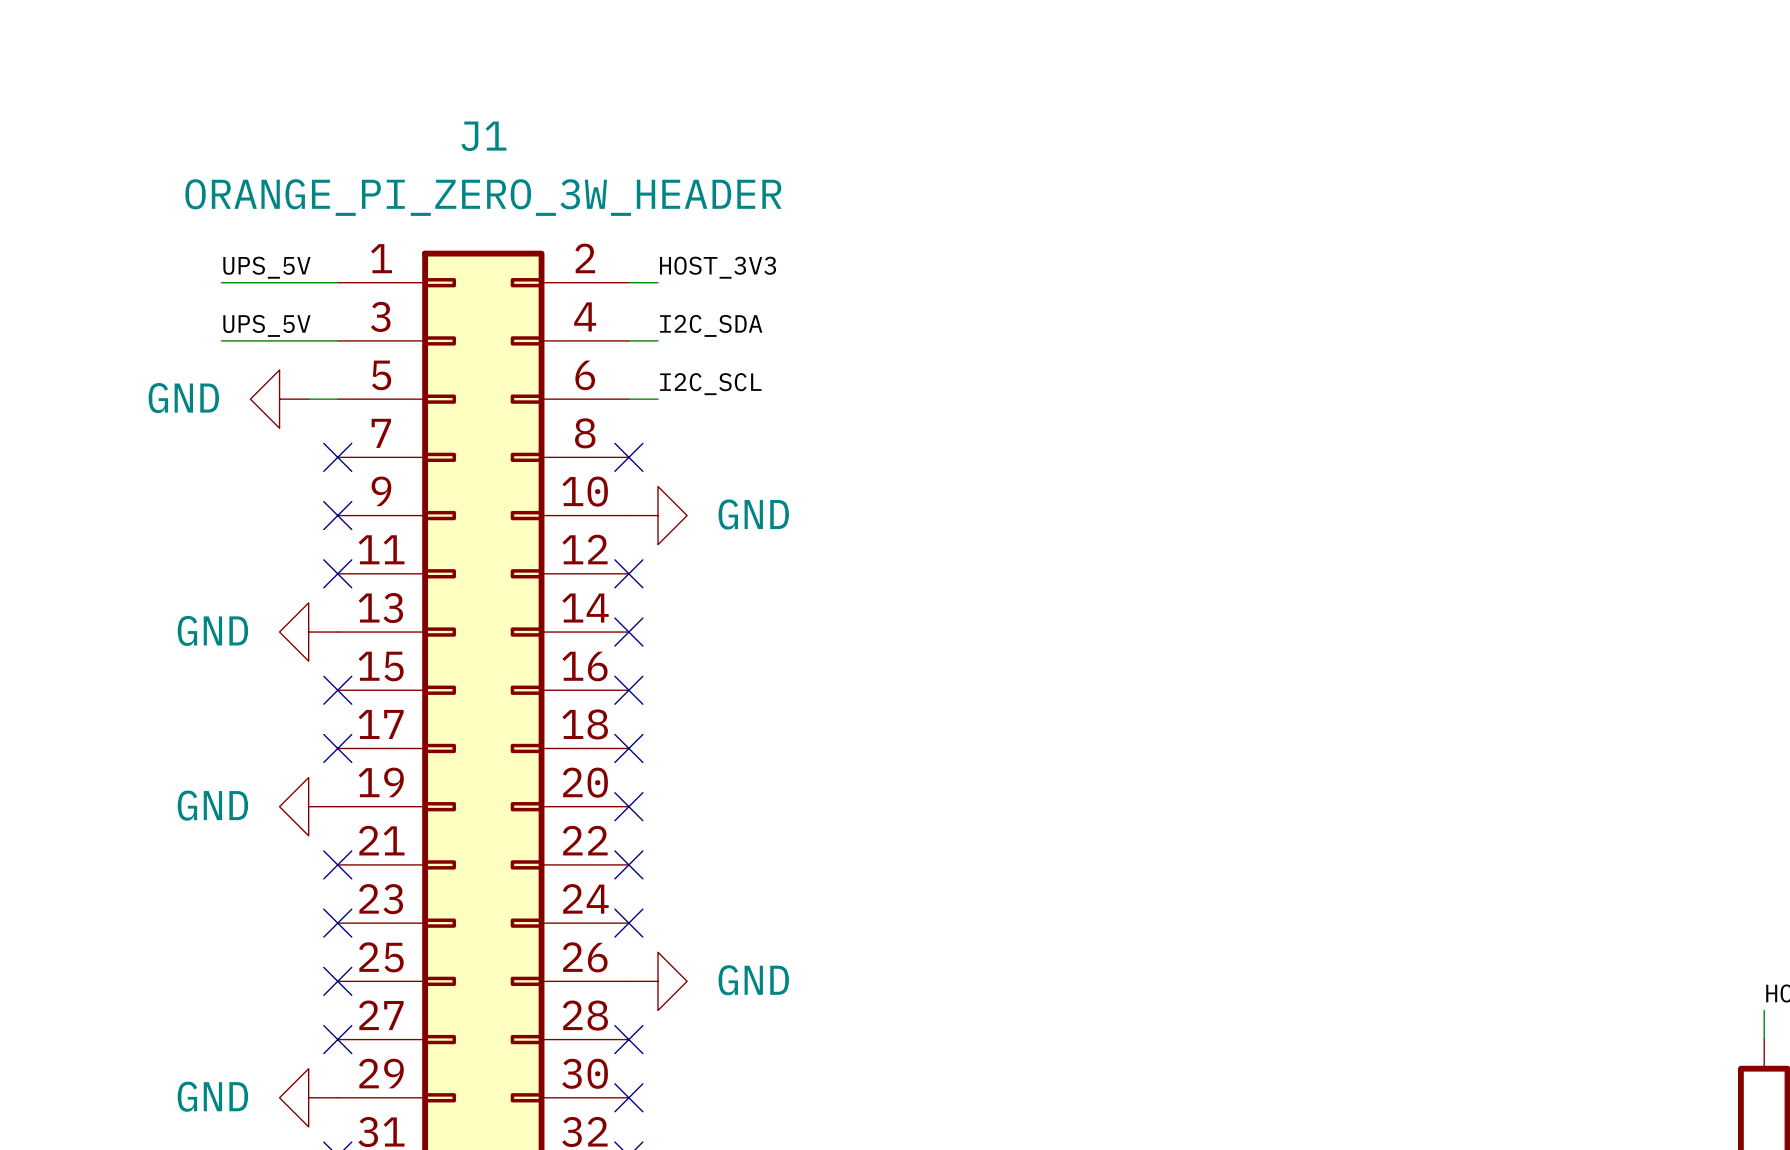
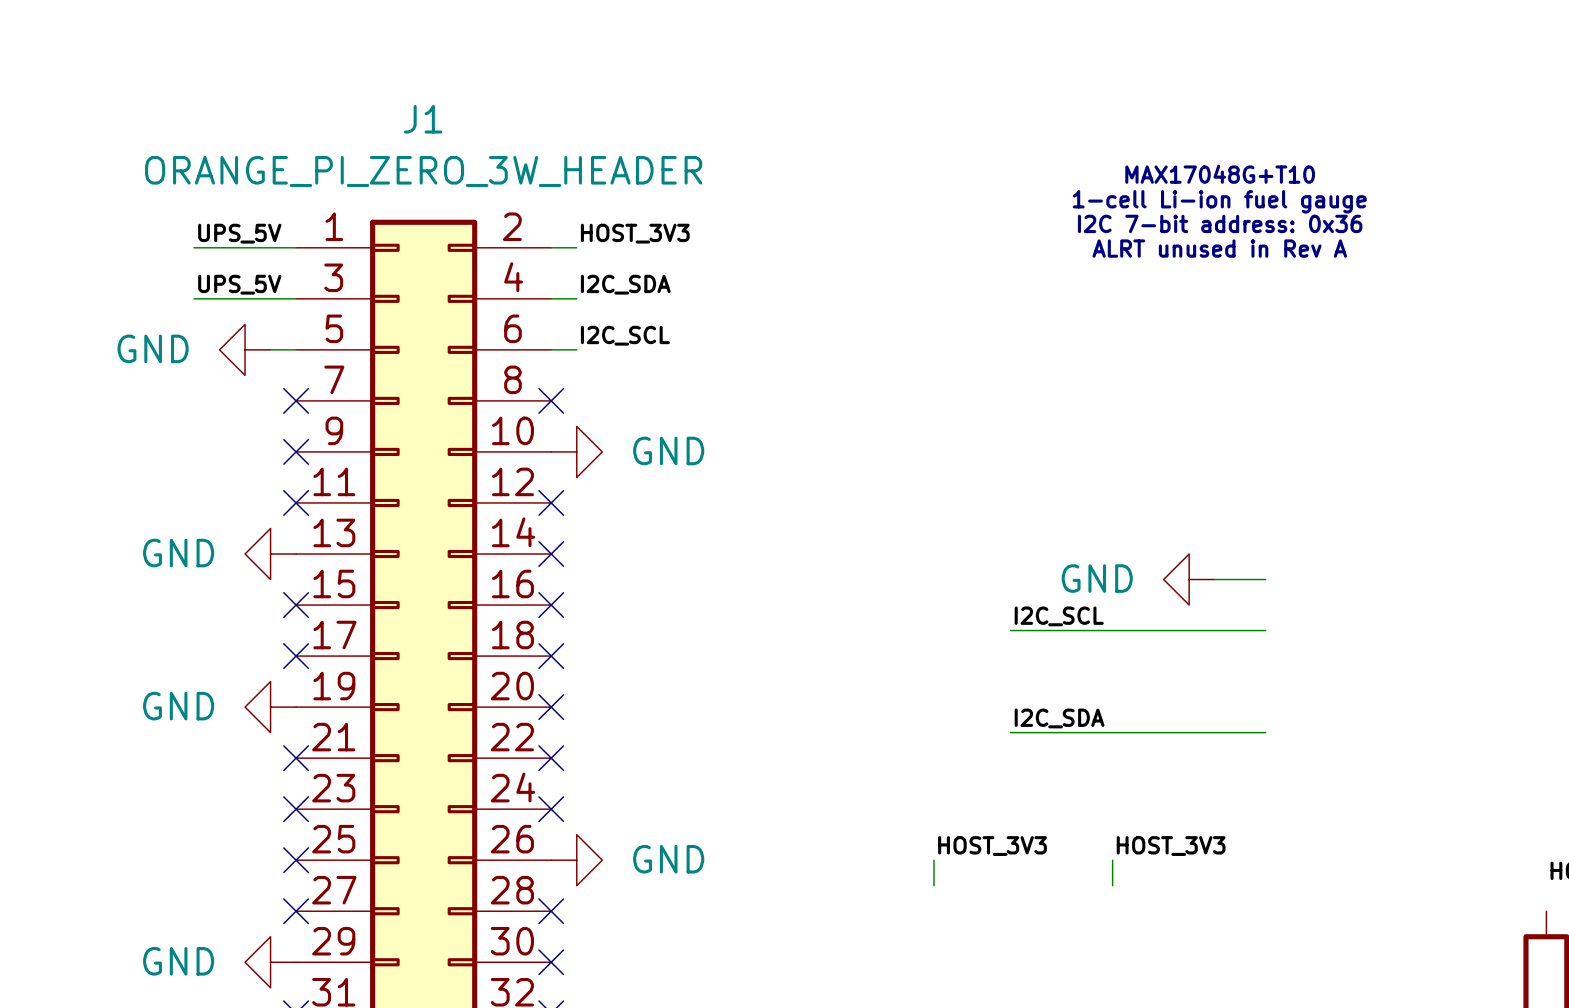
text: none -> MAX17048G+T10 (1220, 174)
text: none -> 1-cell Li-ion fuel gauge (1219, 201)
text: none -> I2C 7-bit address: 0x36 (1220, 223)
text: none -> ALRT unused in Rev A (1219, 248)
power symbol: none -> GND (1189, 579)
wire: none -> (1214, 579) (1265, 579)
label: none -> I2C_SCL (1059, 616)
wire: none -> (1010, 630) (1265, 630)
label: none -> I2C_SDA (1059, 718)
wire: none -> (1010, 732) (1265, 732)
label: none -> HOST_3V3 (992, 846)
label: none -> HOST_3V3 (1171, 846)
wire: none -> (933, 860) (933, 885)
wire: (1764, 1010) (1764, 1039) -> (1112, 860) (1112, 885)

